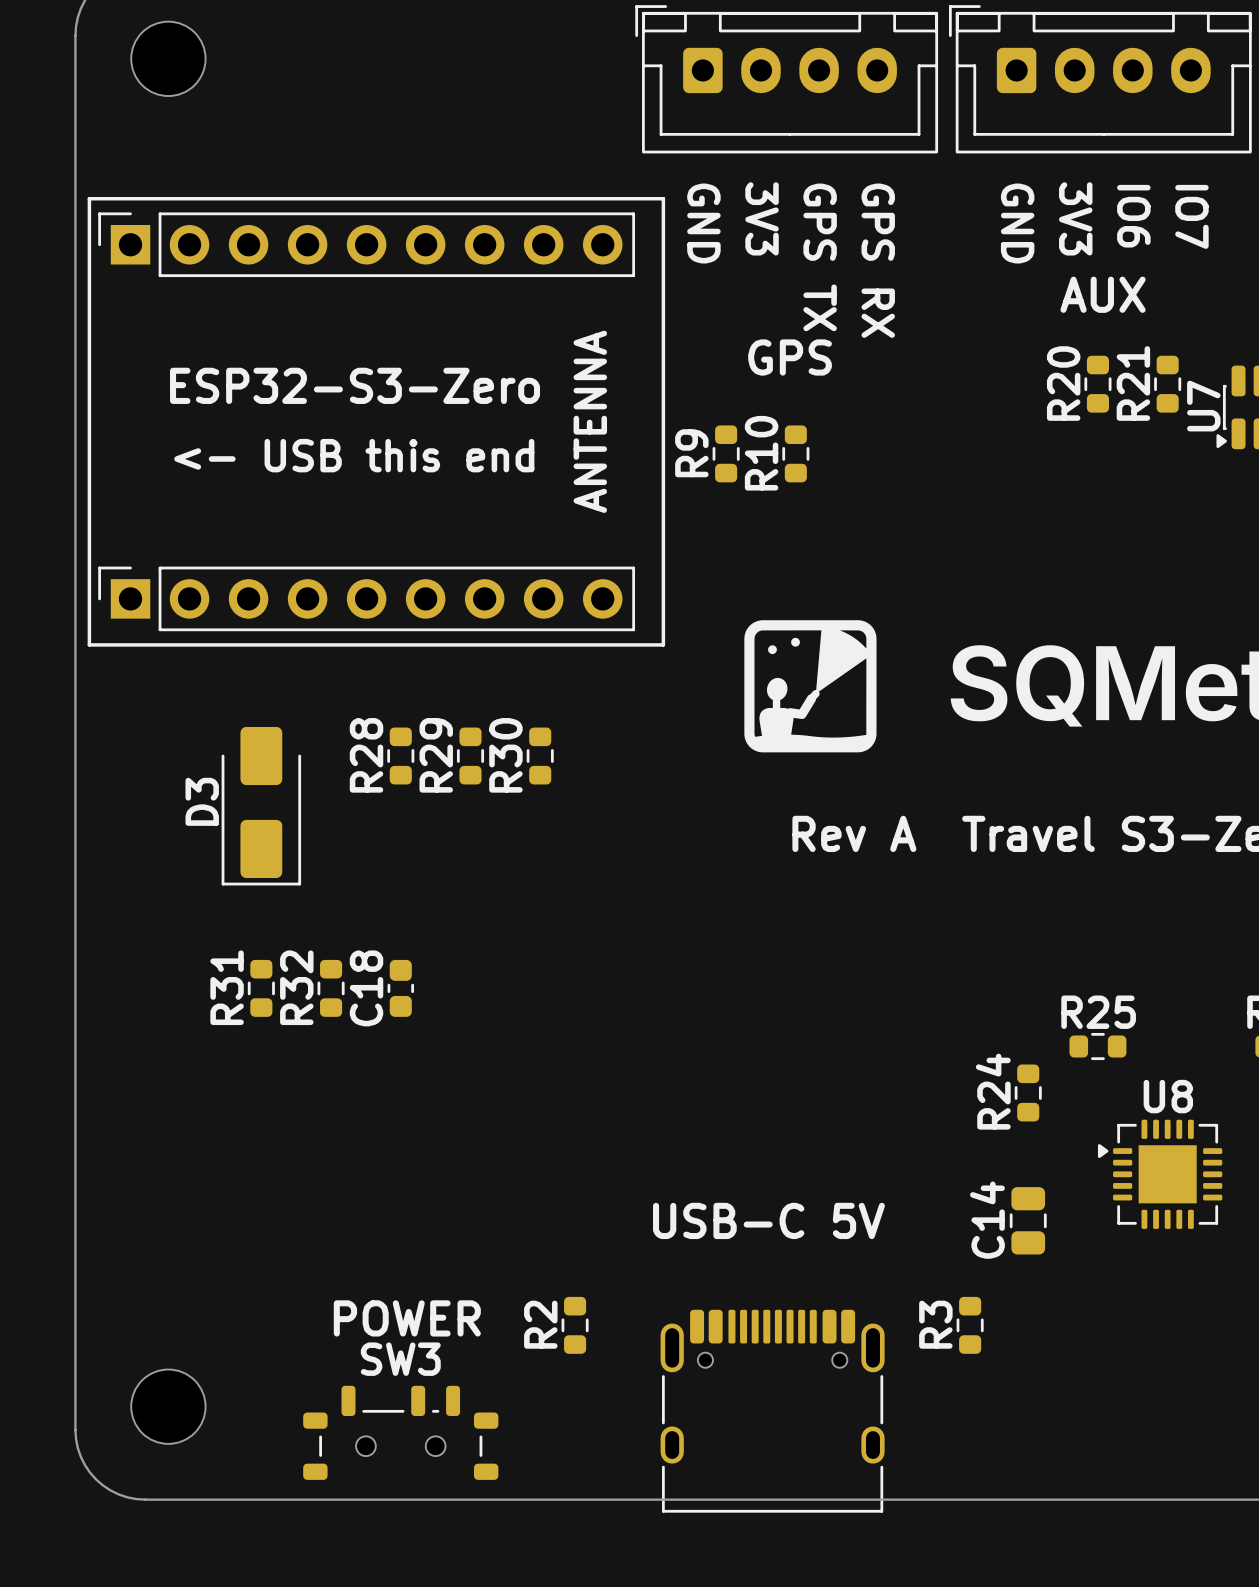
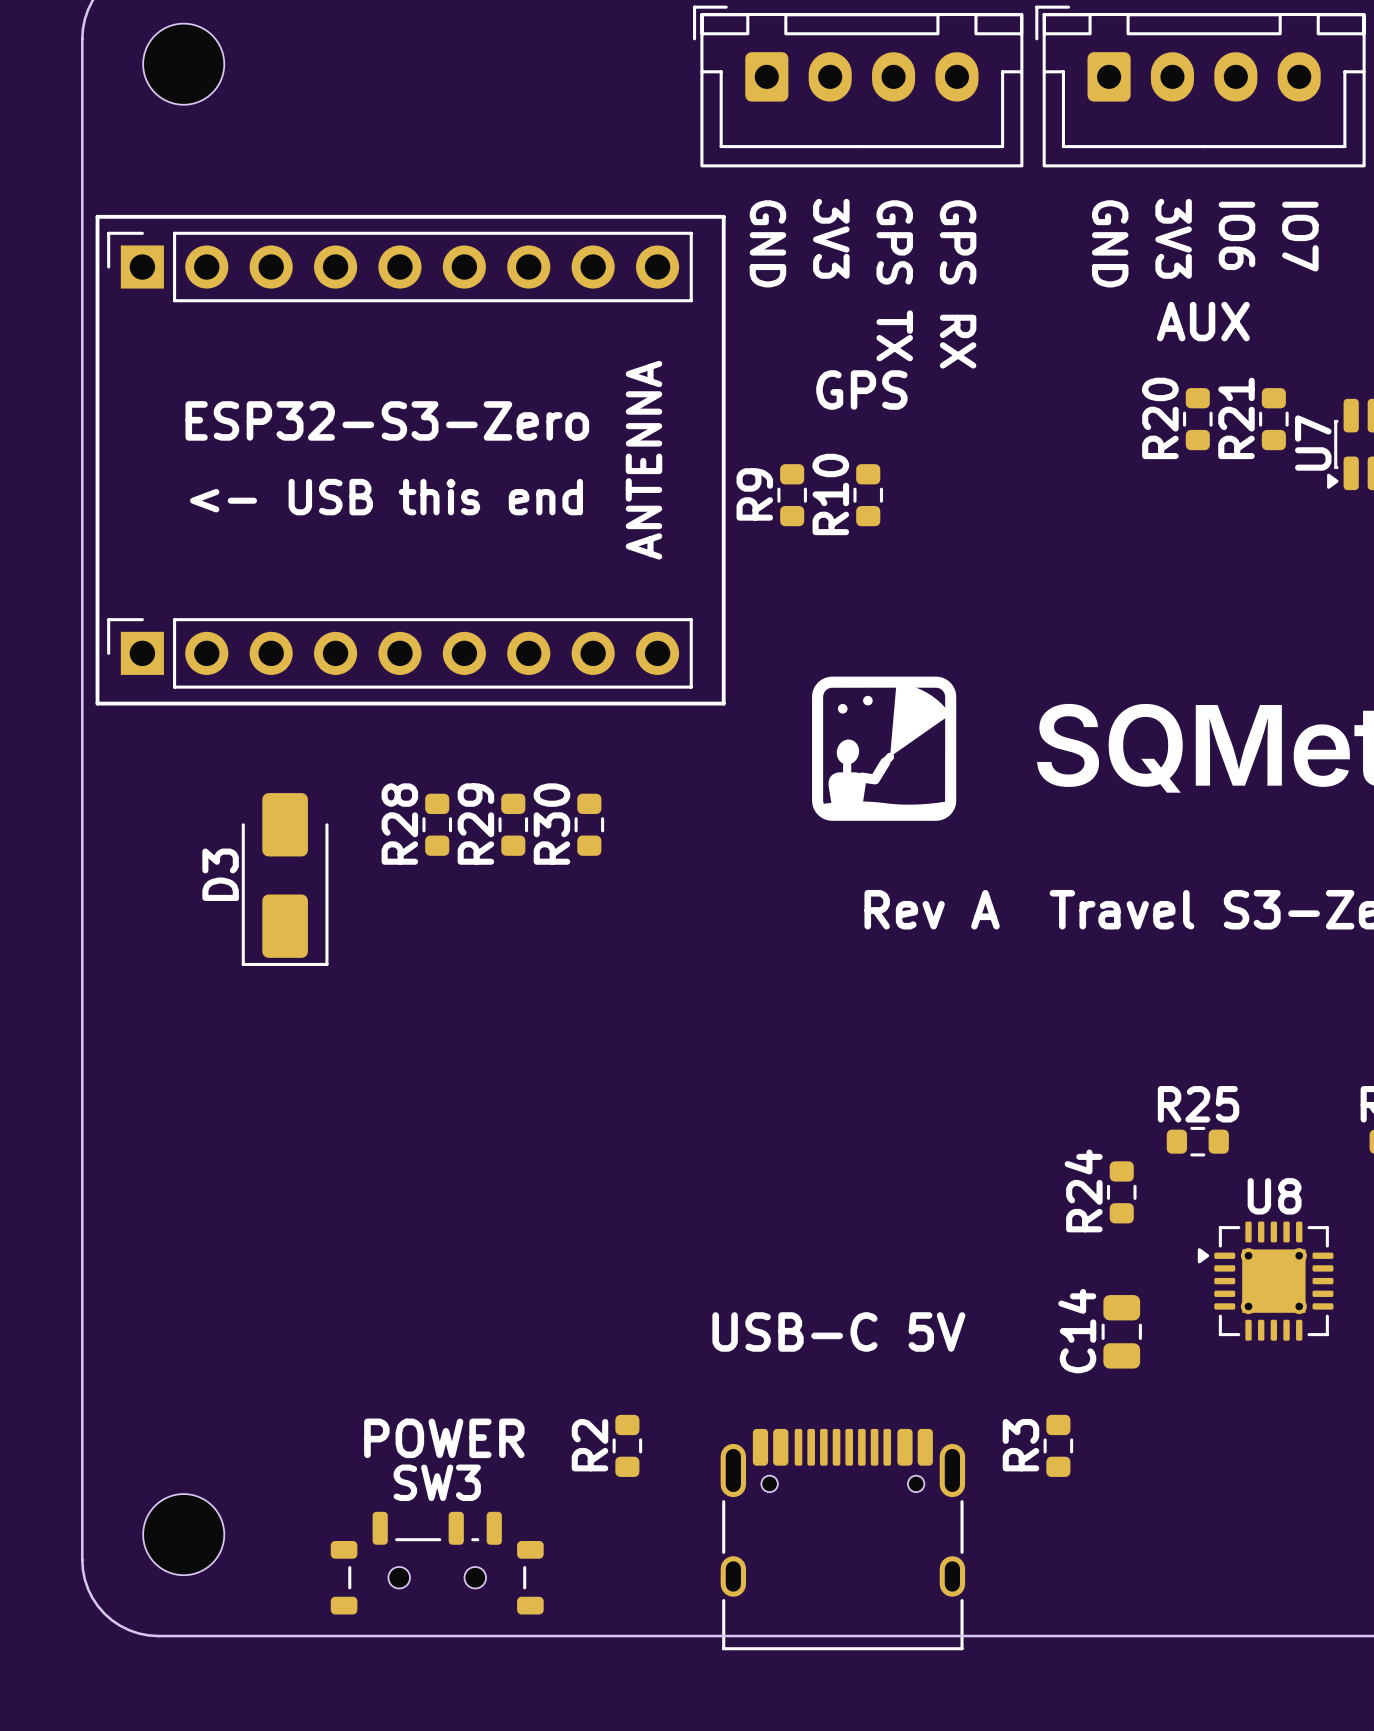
R31: (261, 988) -> none
R32: (331, 988) -> none
C18: (400, 988) -> none
U8 footprint: [1097, 1119, 1223, 1229] -> [1197, 1221, 1334, 1341]

